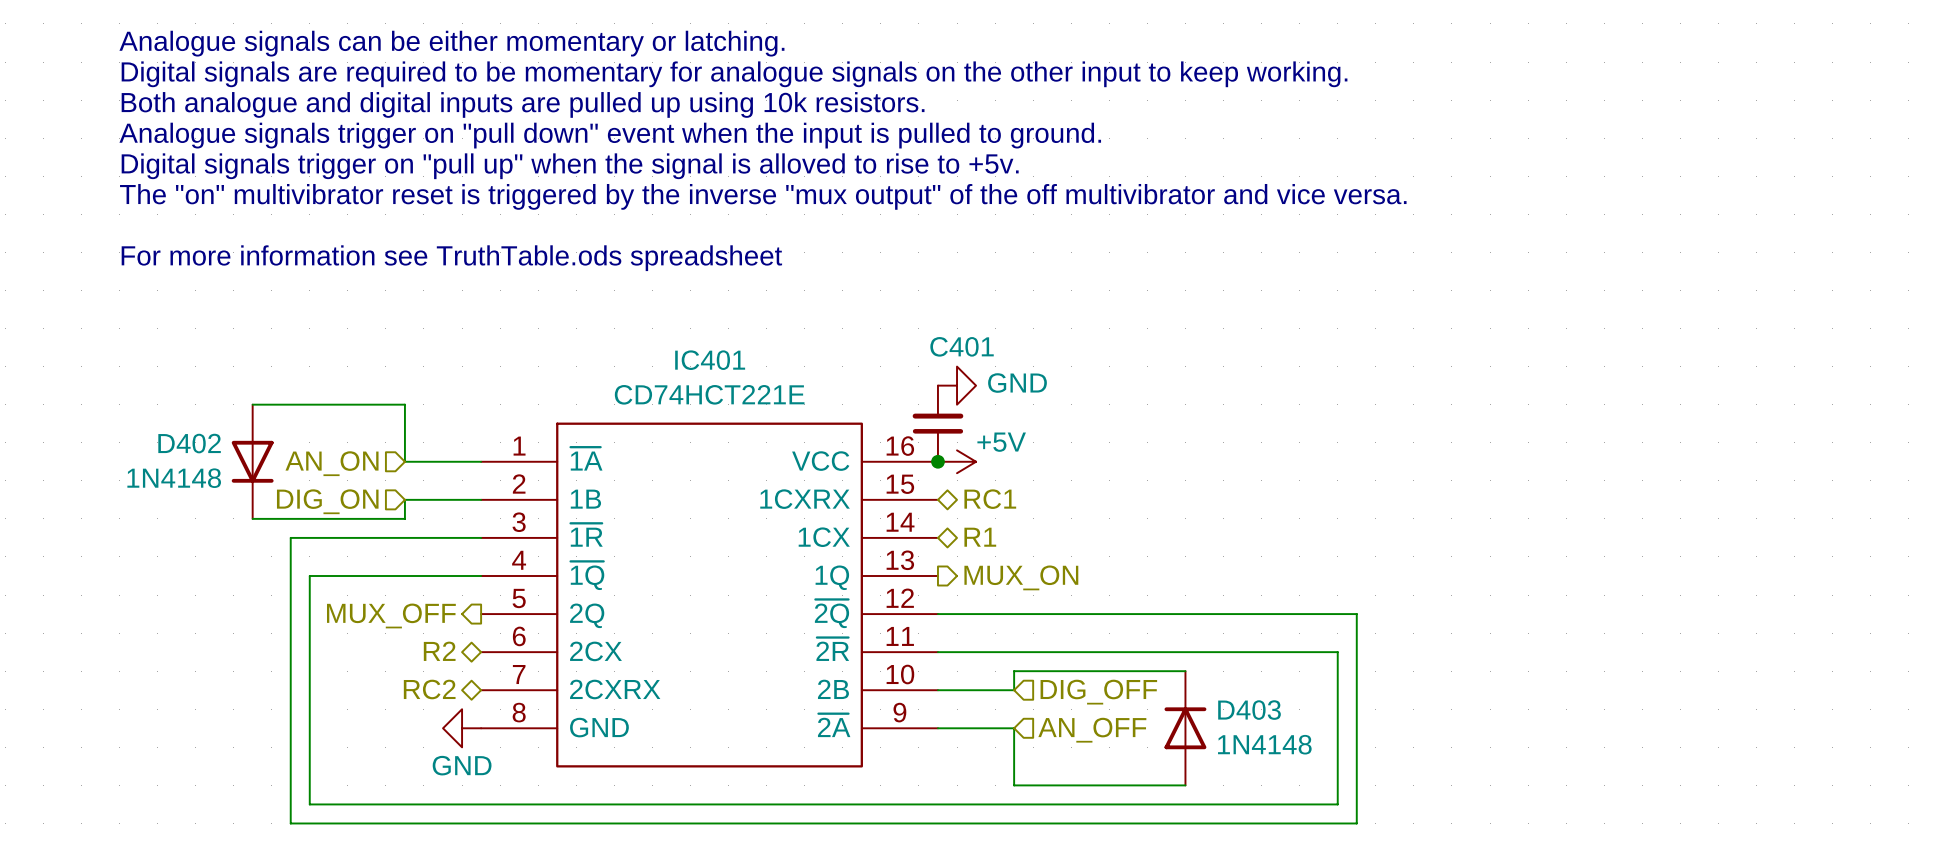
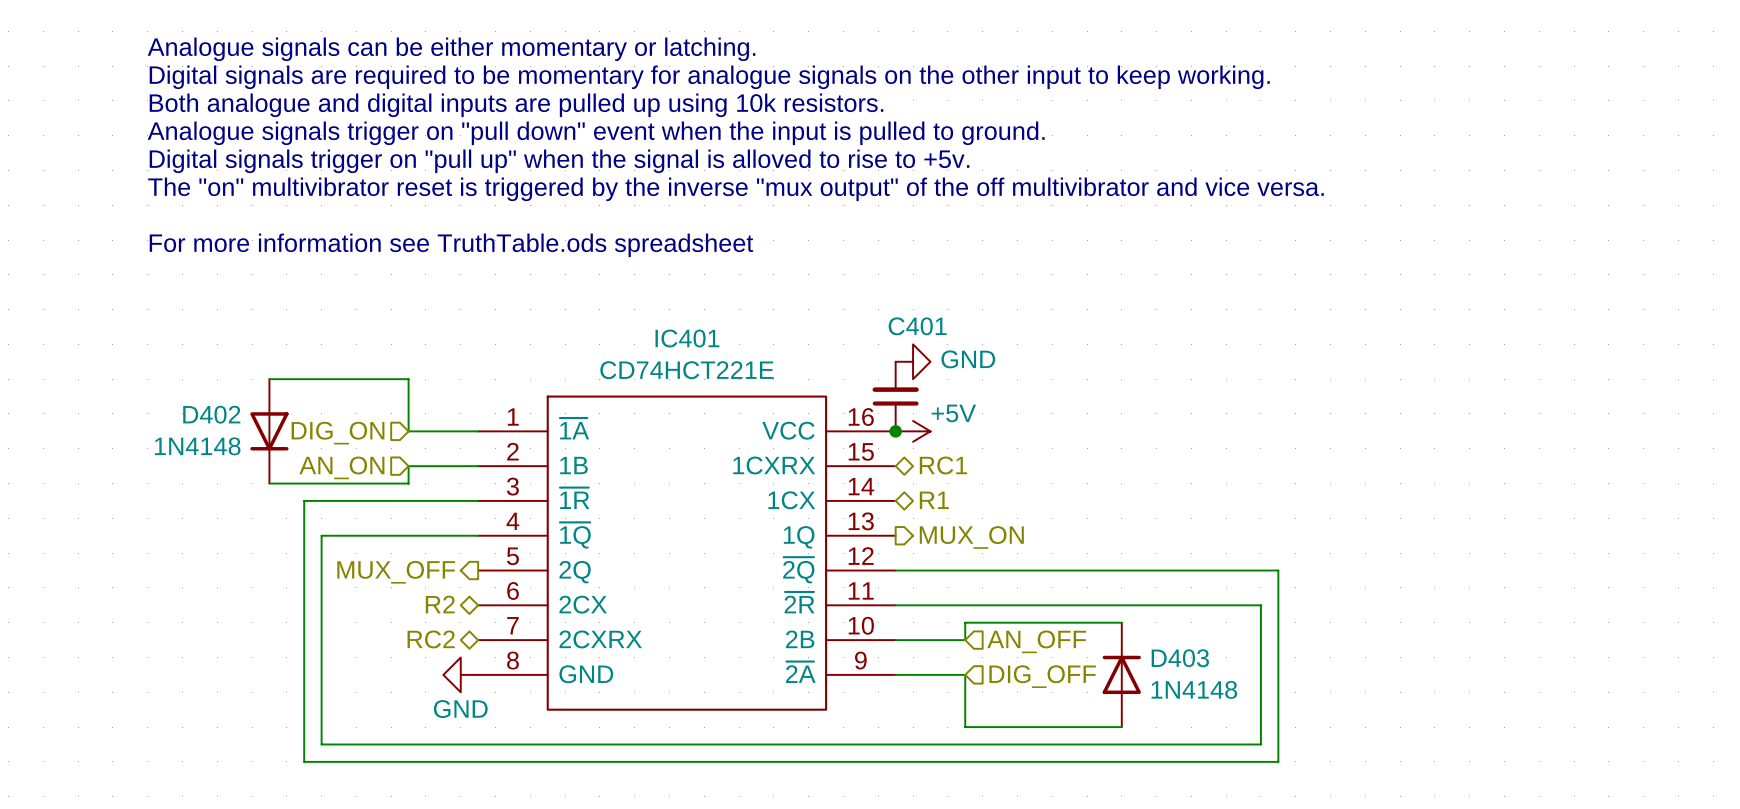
hierarchical label: AN_ON (332, 463) -> DIG_ON (338, 433)
hierarchical label: DIG_ON (327, 501) -> AN_ON (341, 467)
hierarchical label: DIG_OFF (1098, 692) -> AN_OFF (1036, 641)
hierarchical label: AN_OFF (1092, 730) -> DIG_OFF (1042, 676)

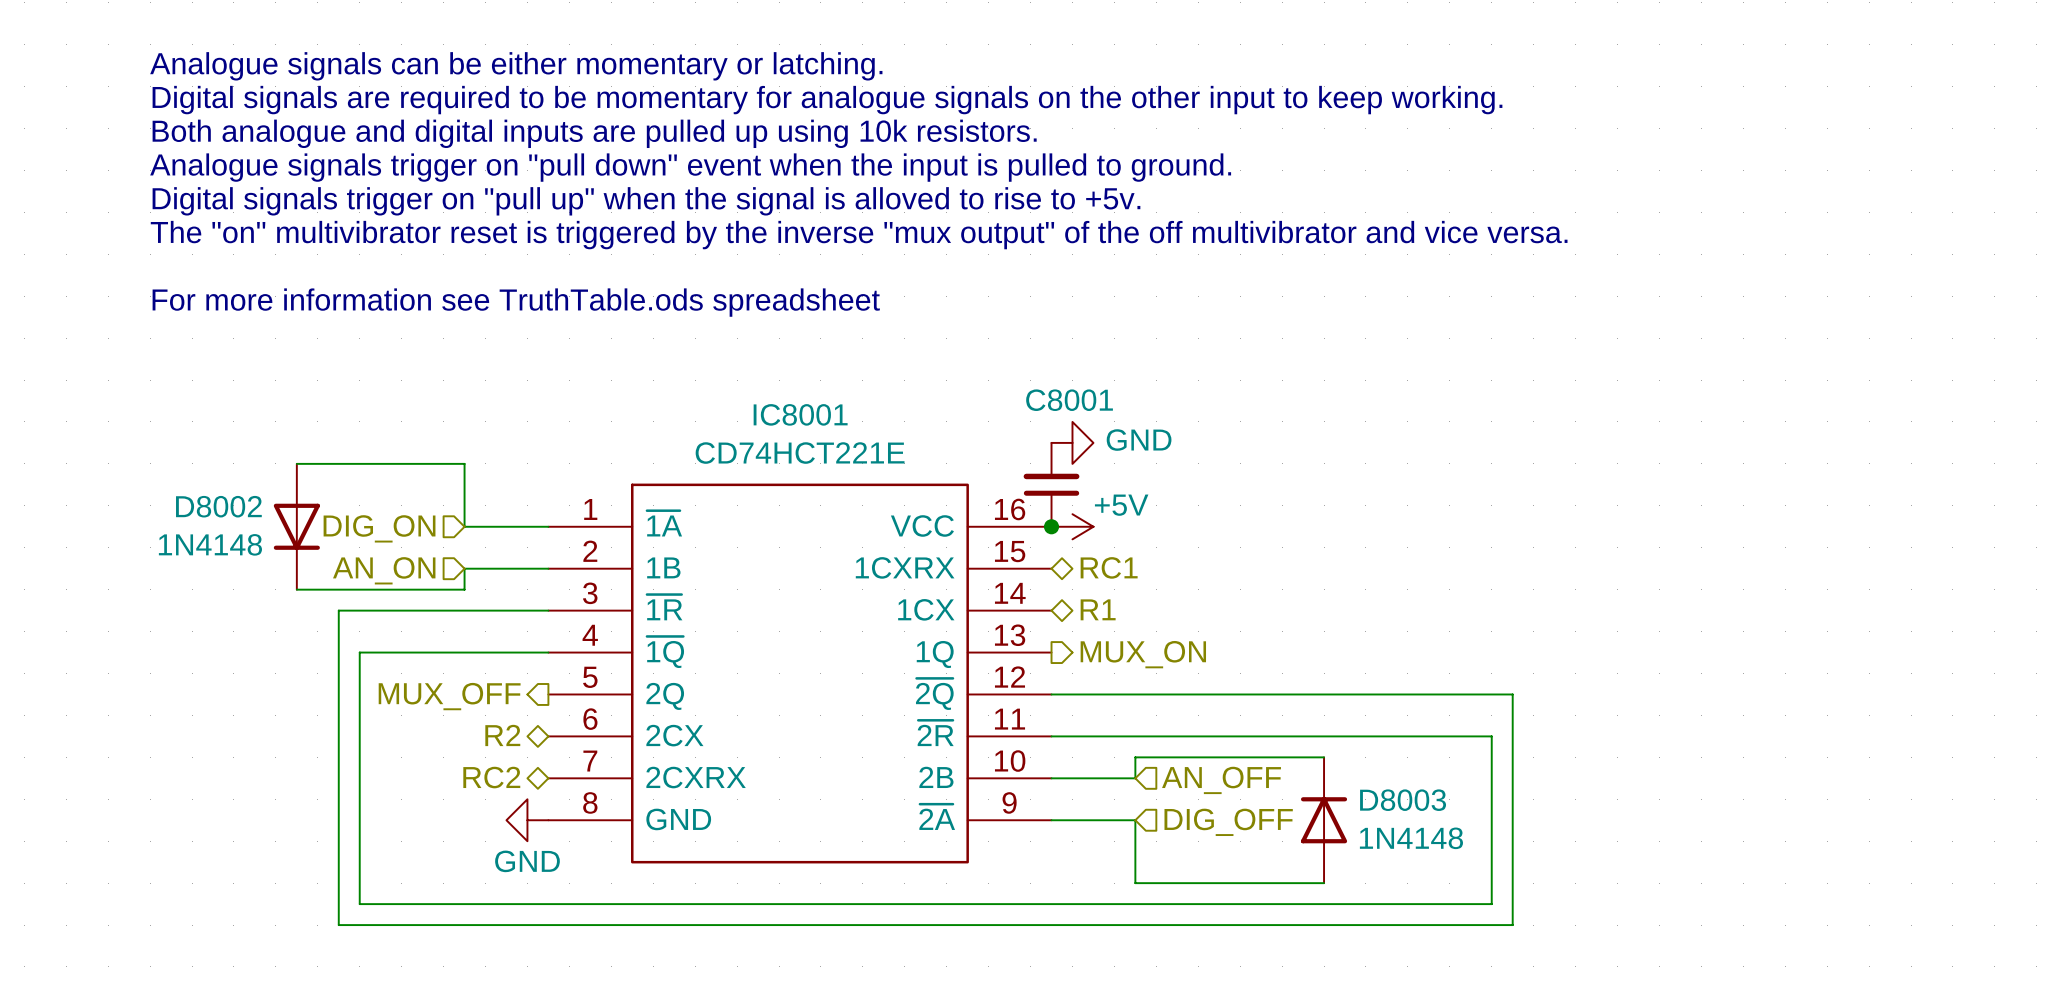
C401 name: C401 (917, 326) -> C8001 (1069, 400)
IC401 name: IC401 (687, 338) -> IC8001 (800, 414)
D402 name: D402 (211, 414) -> D8002 (218, 506)
D403 name: D403 (1180, 658) -> D8003 (1403, 800)

